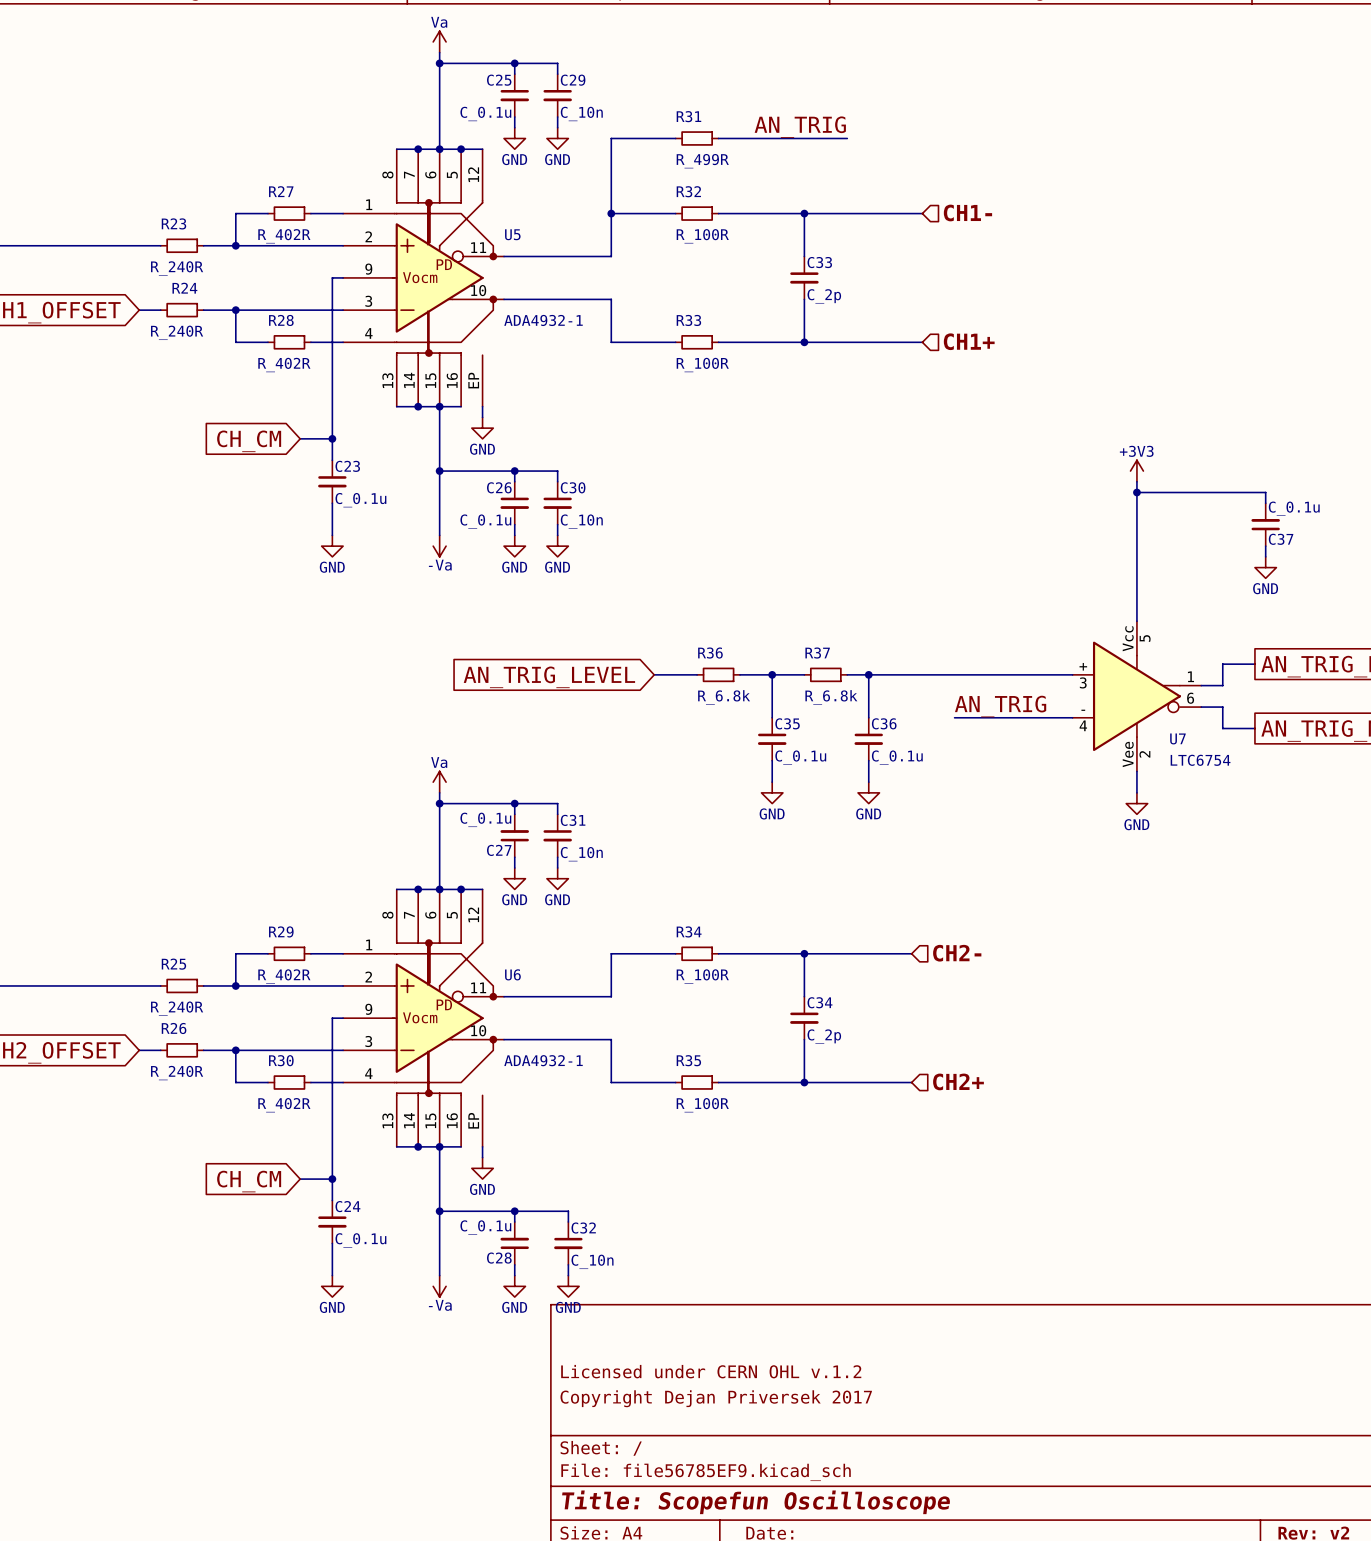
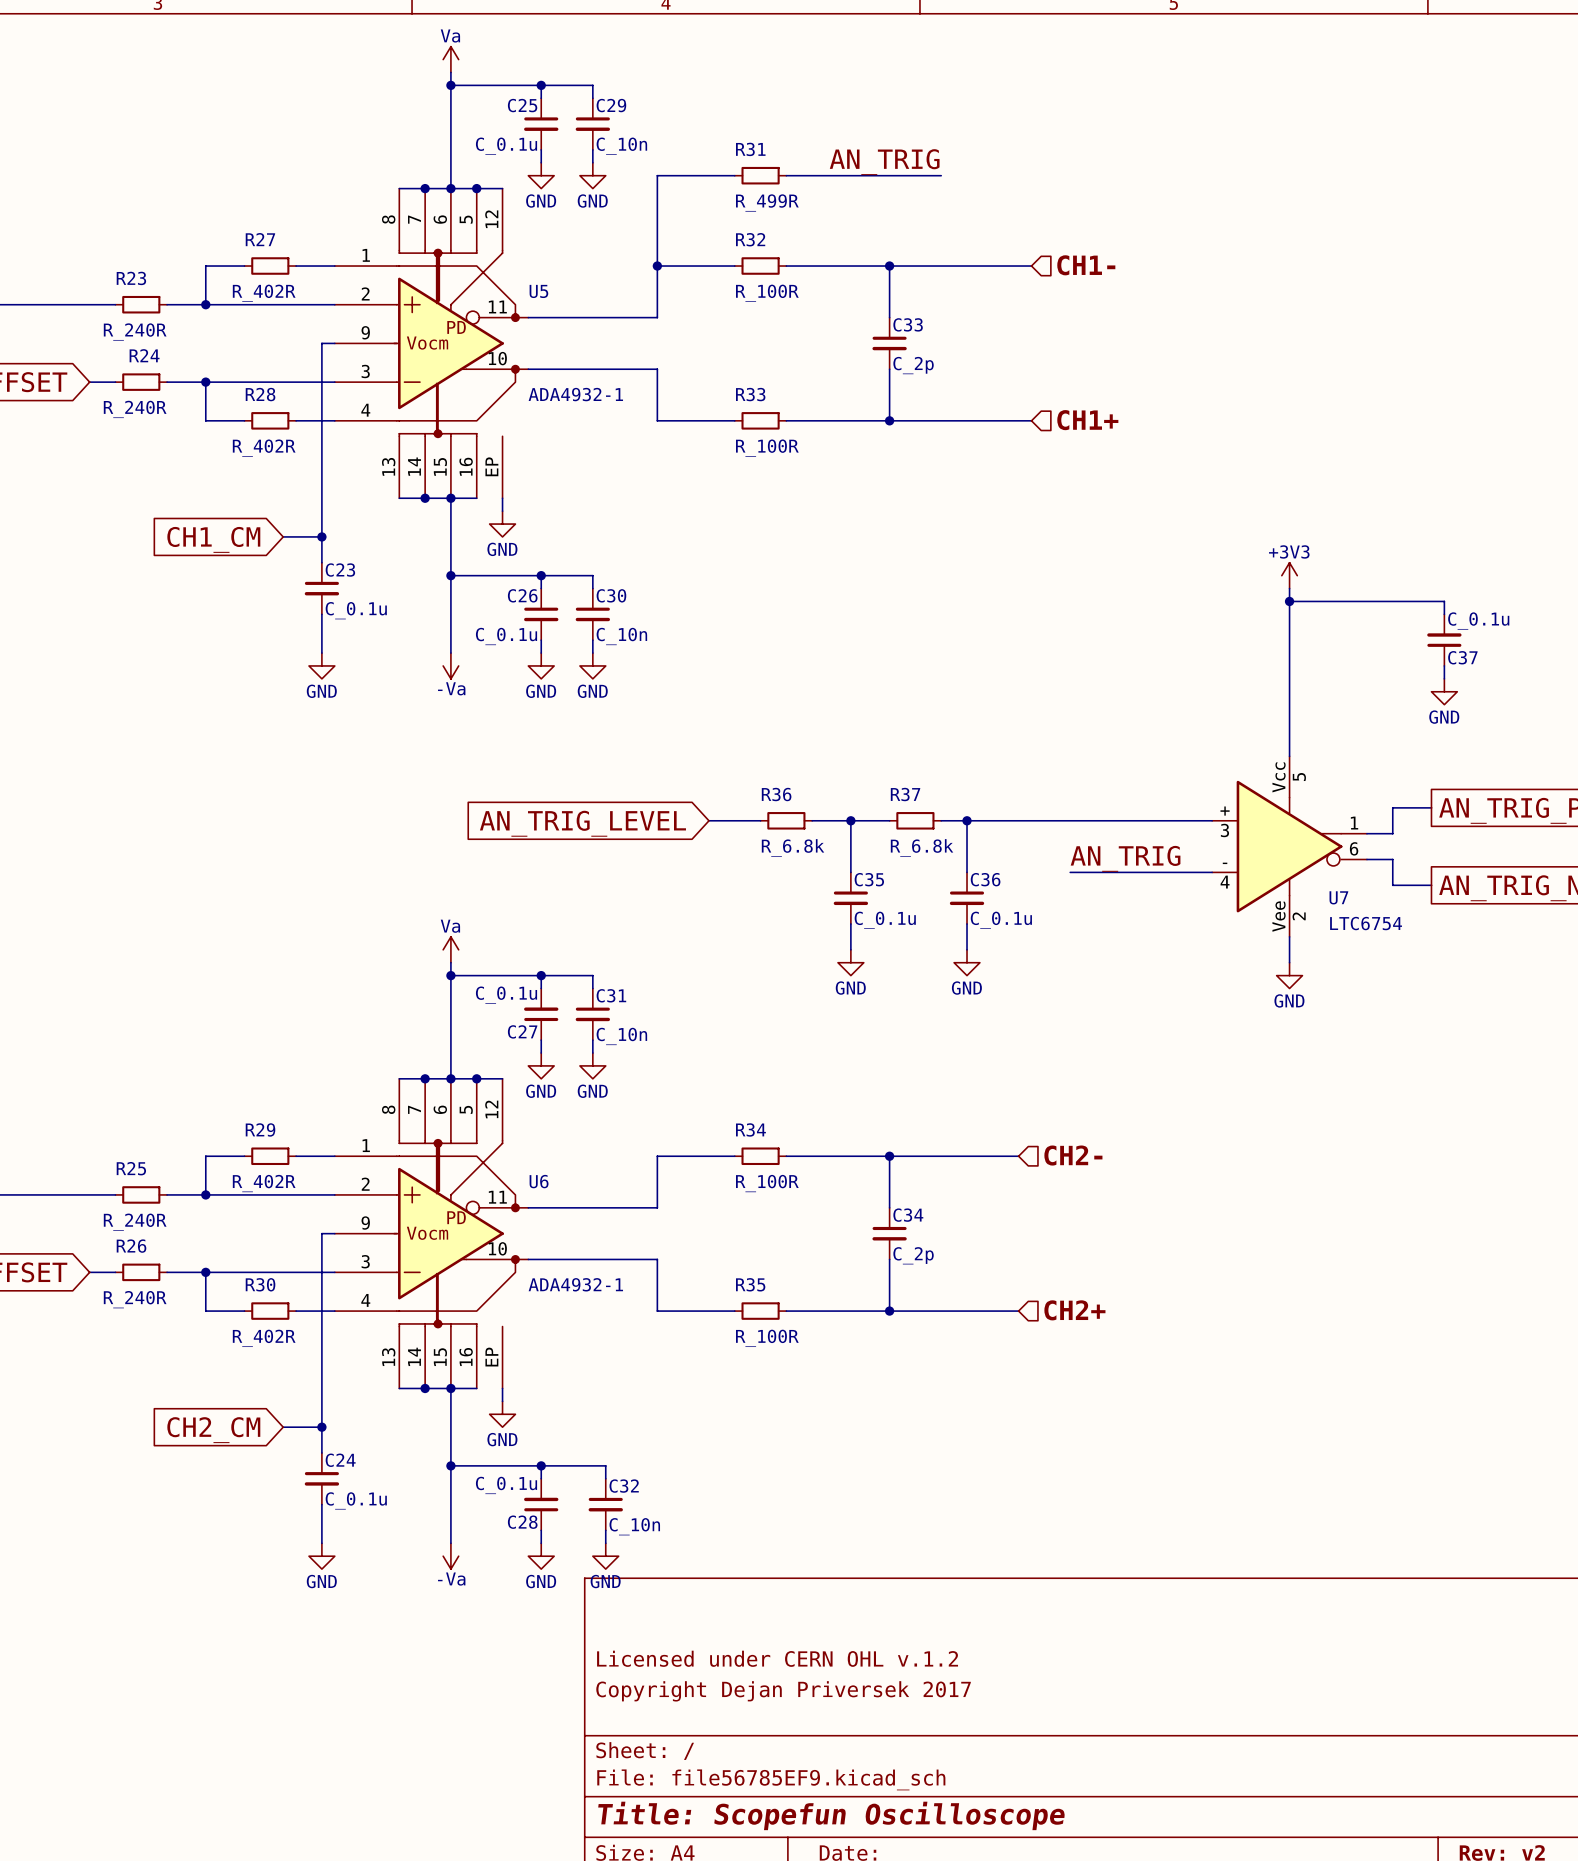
global label: CH_CM (249, 441) -> CH1_CM (213, 539)
global label: CH_CM (249, 1181) -> CH2_CM (213, 1430)

